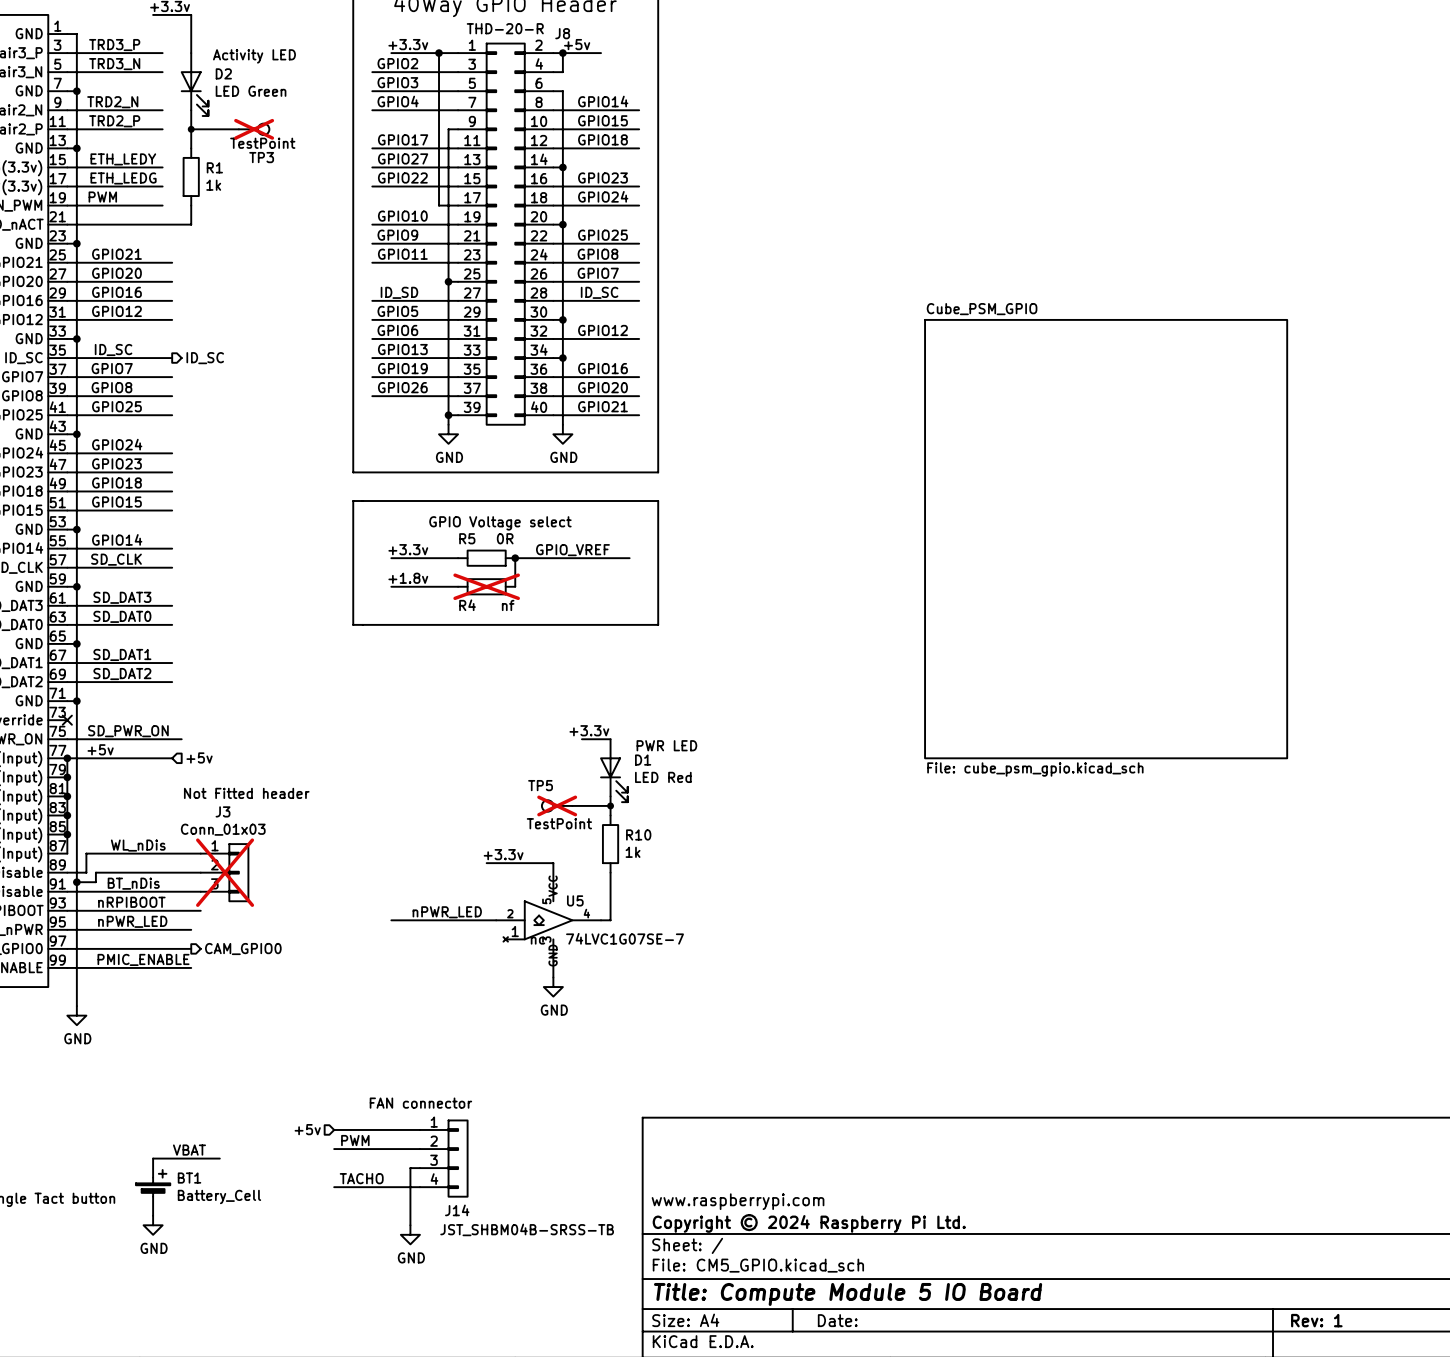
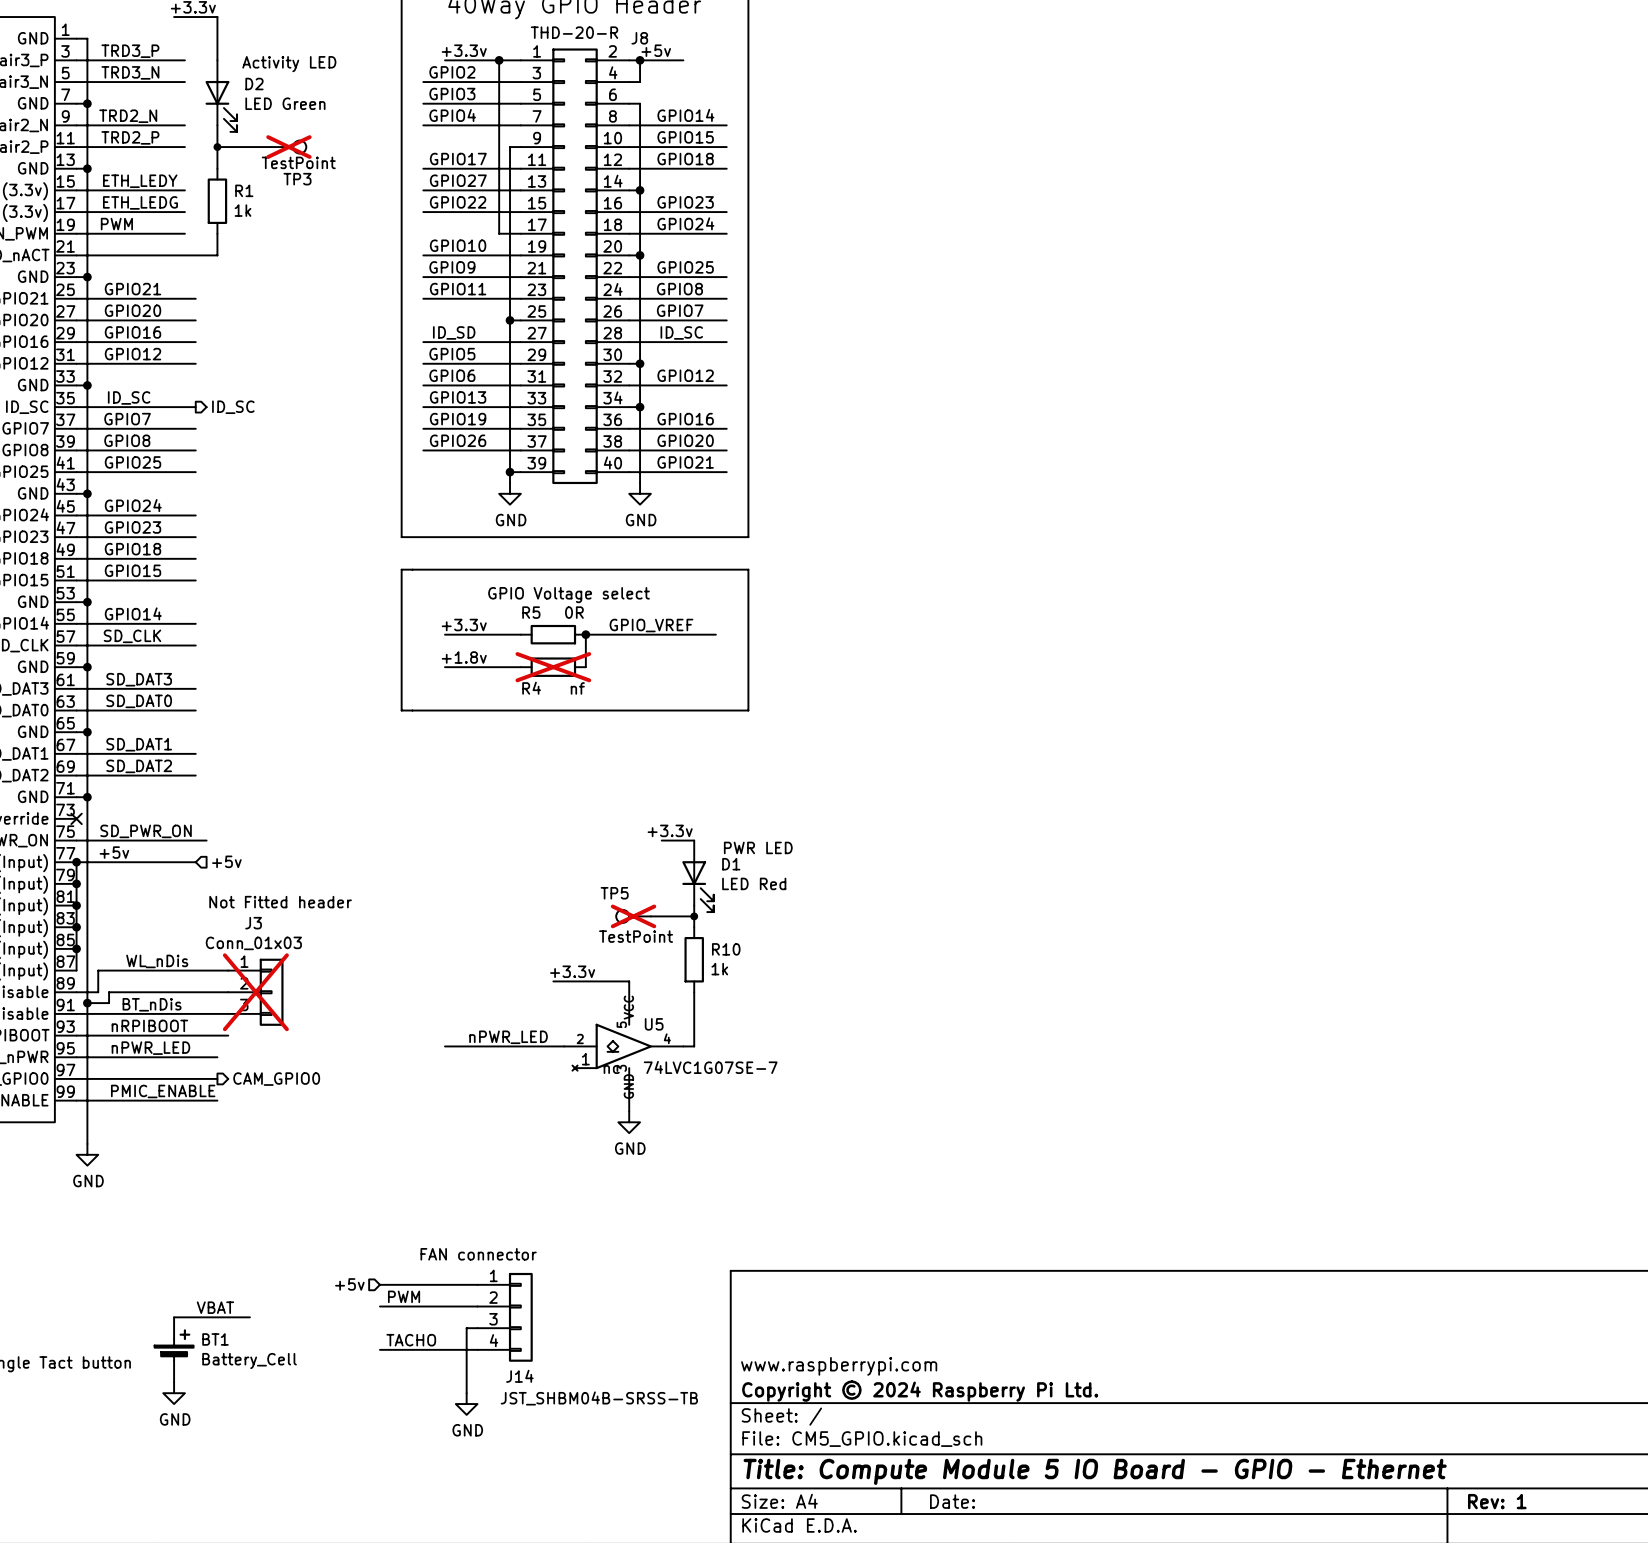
sheet Cube_PSM_GPIO: File: cube_psm_gpio.kicad_sch (1106, 539) -> none
title block: Title: Compute Module 5 IO Board (848, 1294) -> Title: Compute Module 5 IO Board - GPIO - Ethernet (1095, 1471)

